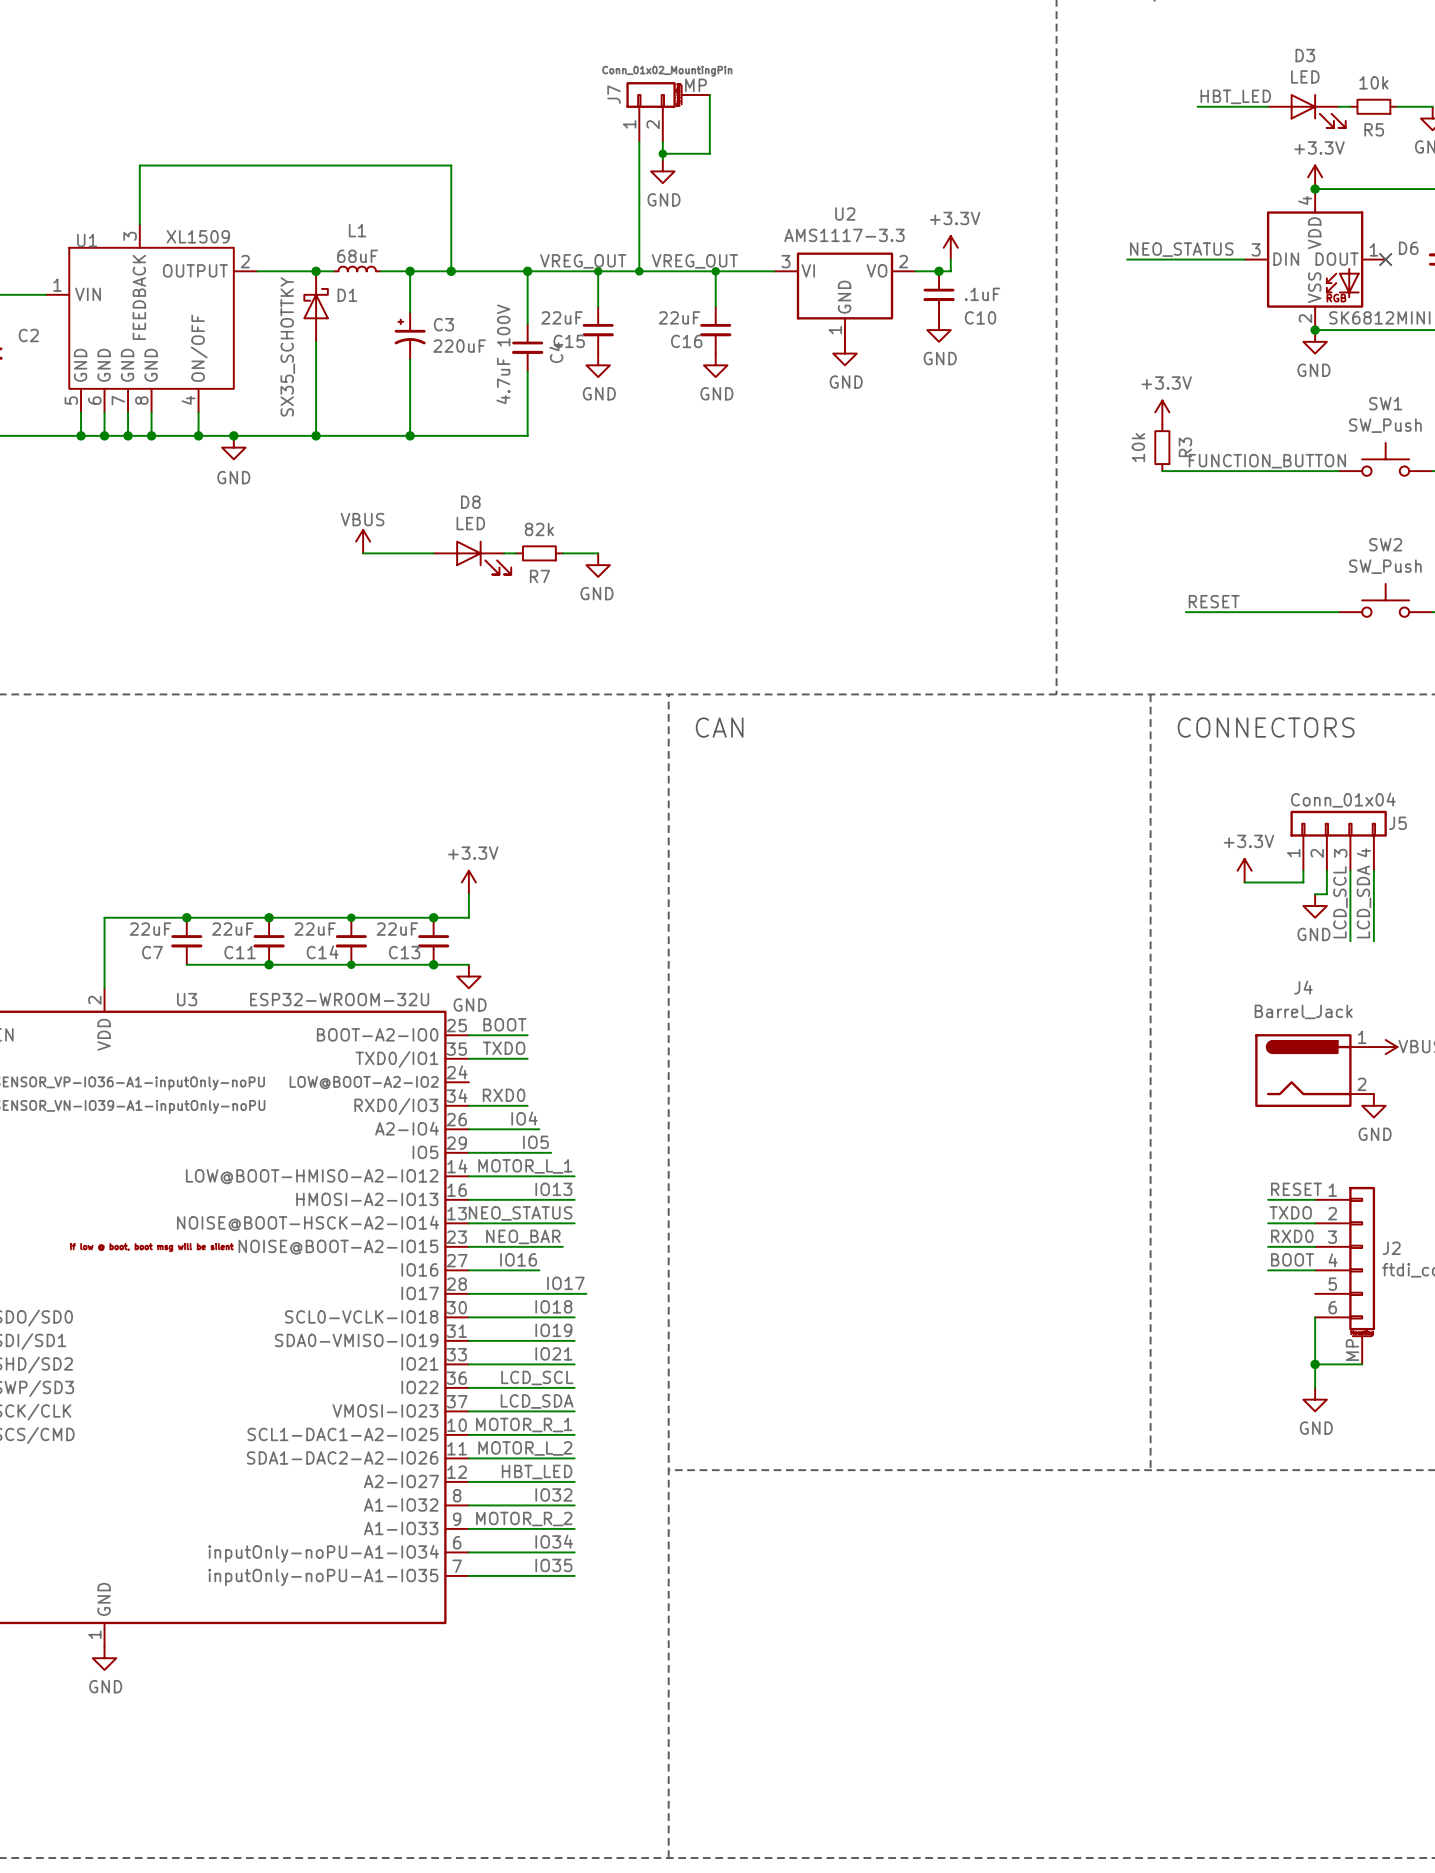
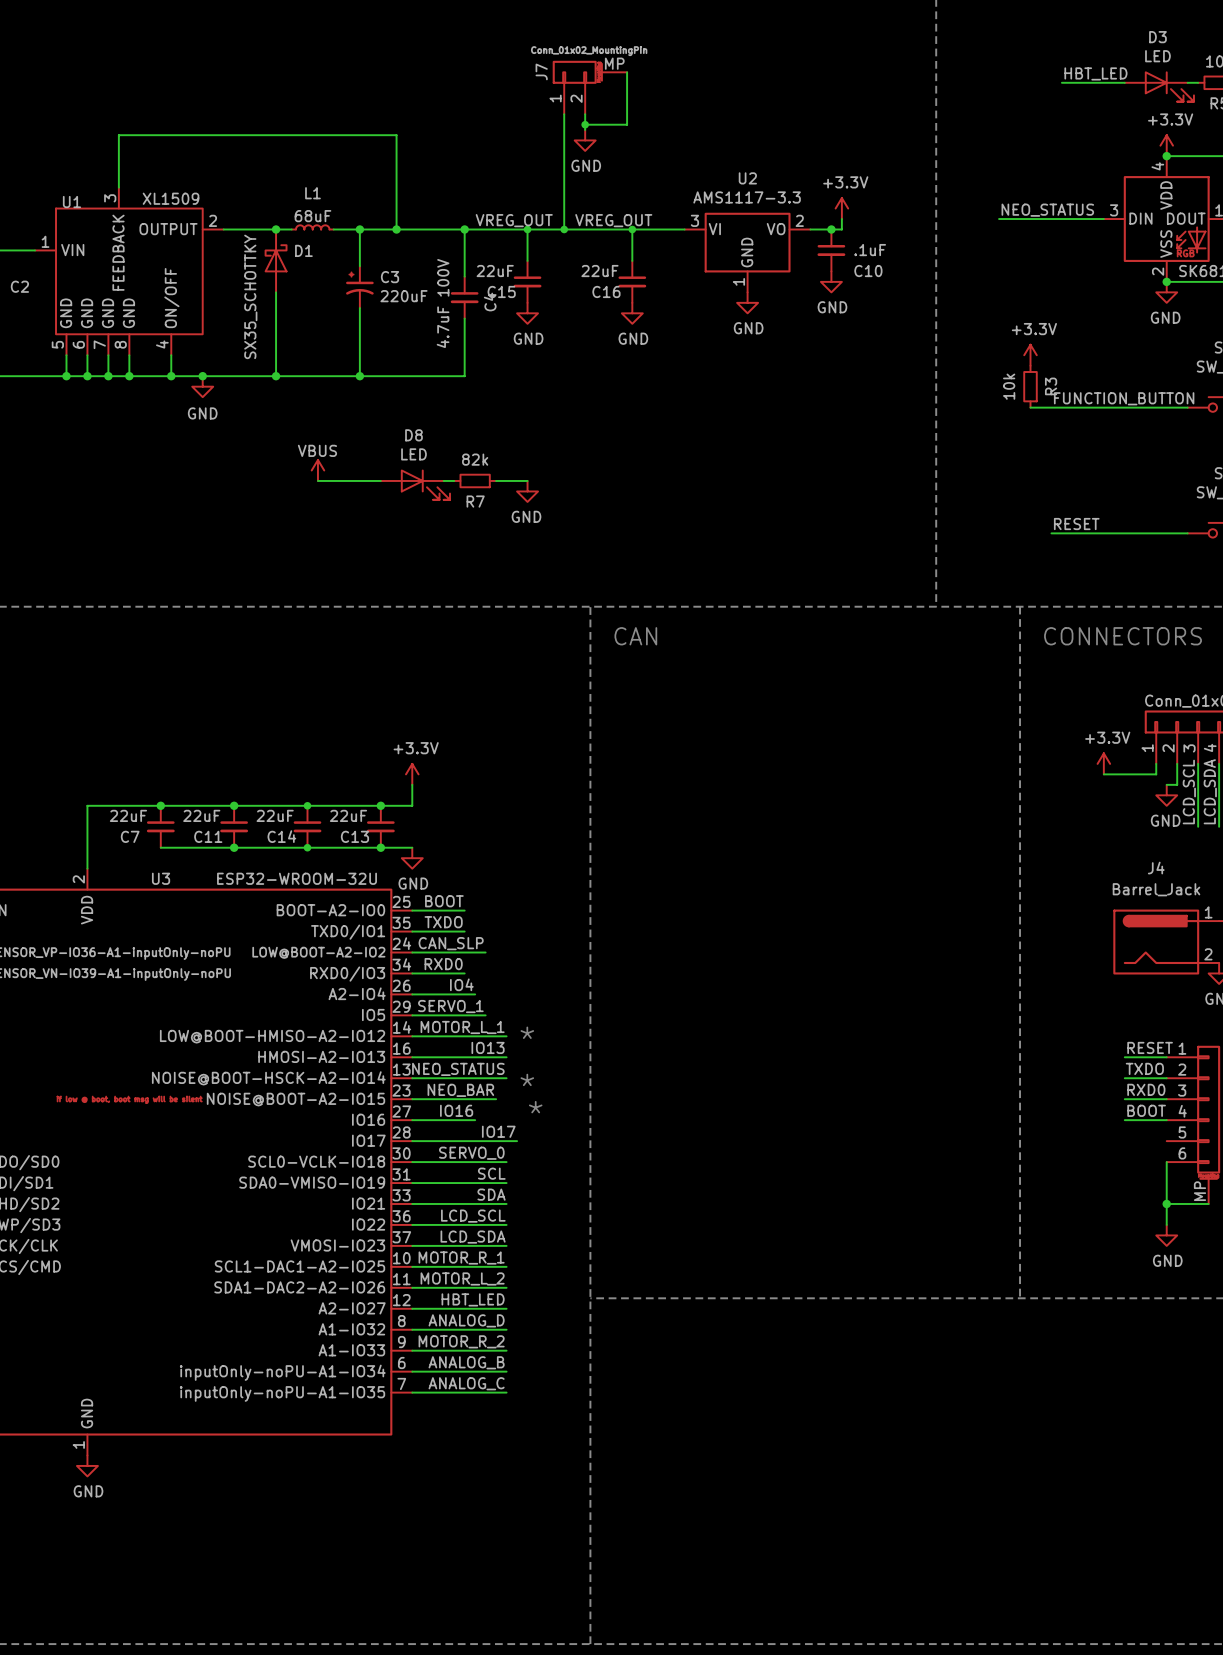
label: none -> CAN_SLP (451, 943)
wire: none -> (412, 952) (485, 952)
label: IO5 (535, 1142) -> SERVO_1 (450, 1006)
text: none -> * (527, 1032)
text: none -> * (527, 1079)
text: none -> * (535, 1107)
label: IO18 (553, 1306) -> SERVO_0 (471, 1153)
label: IO19 (553, 1330) -> SCL (491, 1173)
label: IO21 (553, 1353) -> SDA (491, 1194)
label: IO32 (553, 1494) -> ANALOG_D (466, 1320)
label: IO34 (554, 1541) -> ANALOG_B (466, 1362)
label: IO35 (553, 1565) -> ANALOG_C (466, 1383)

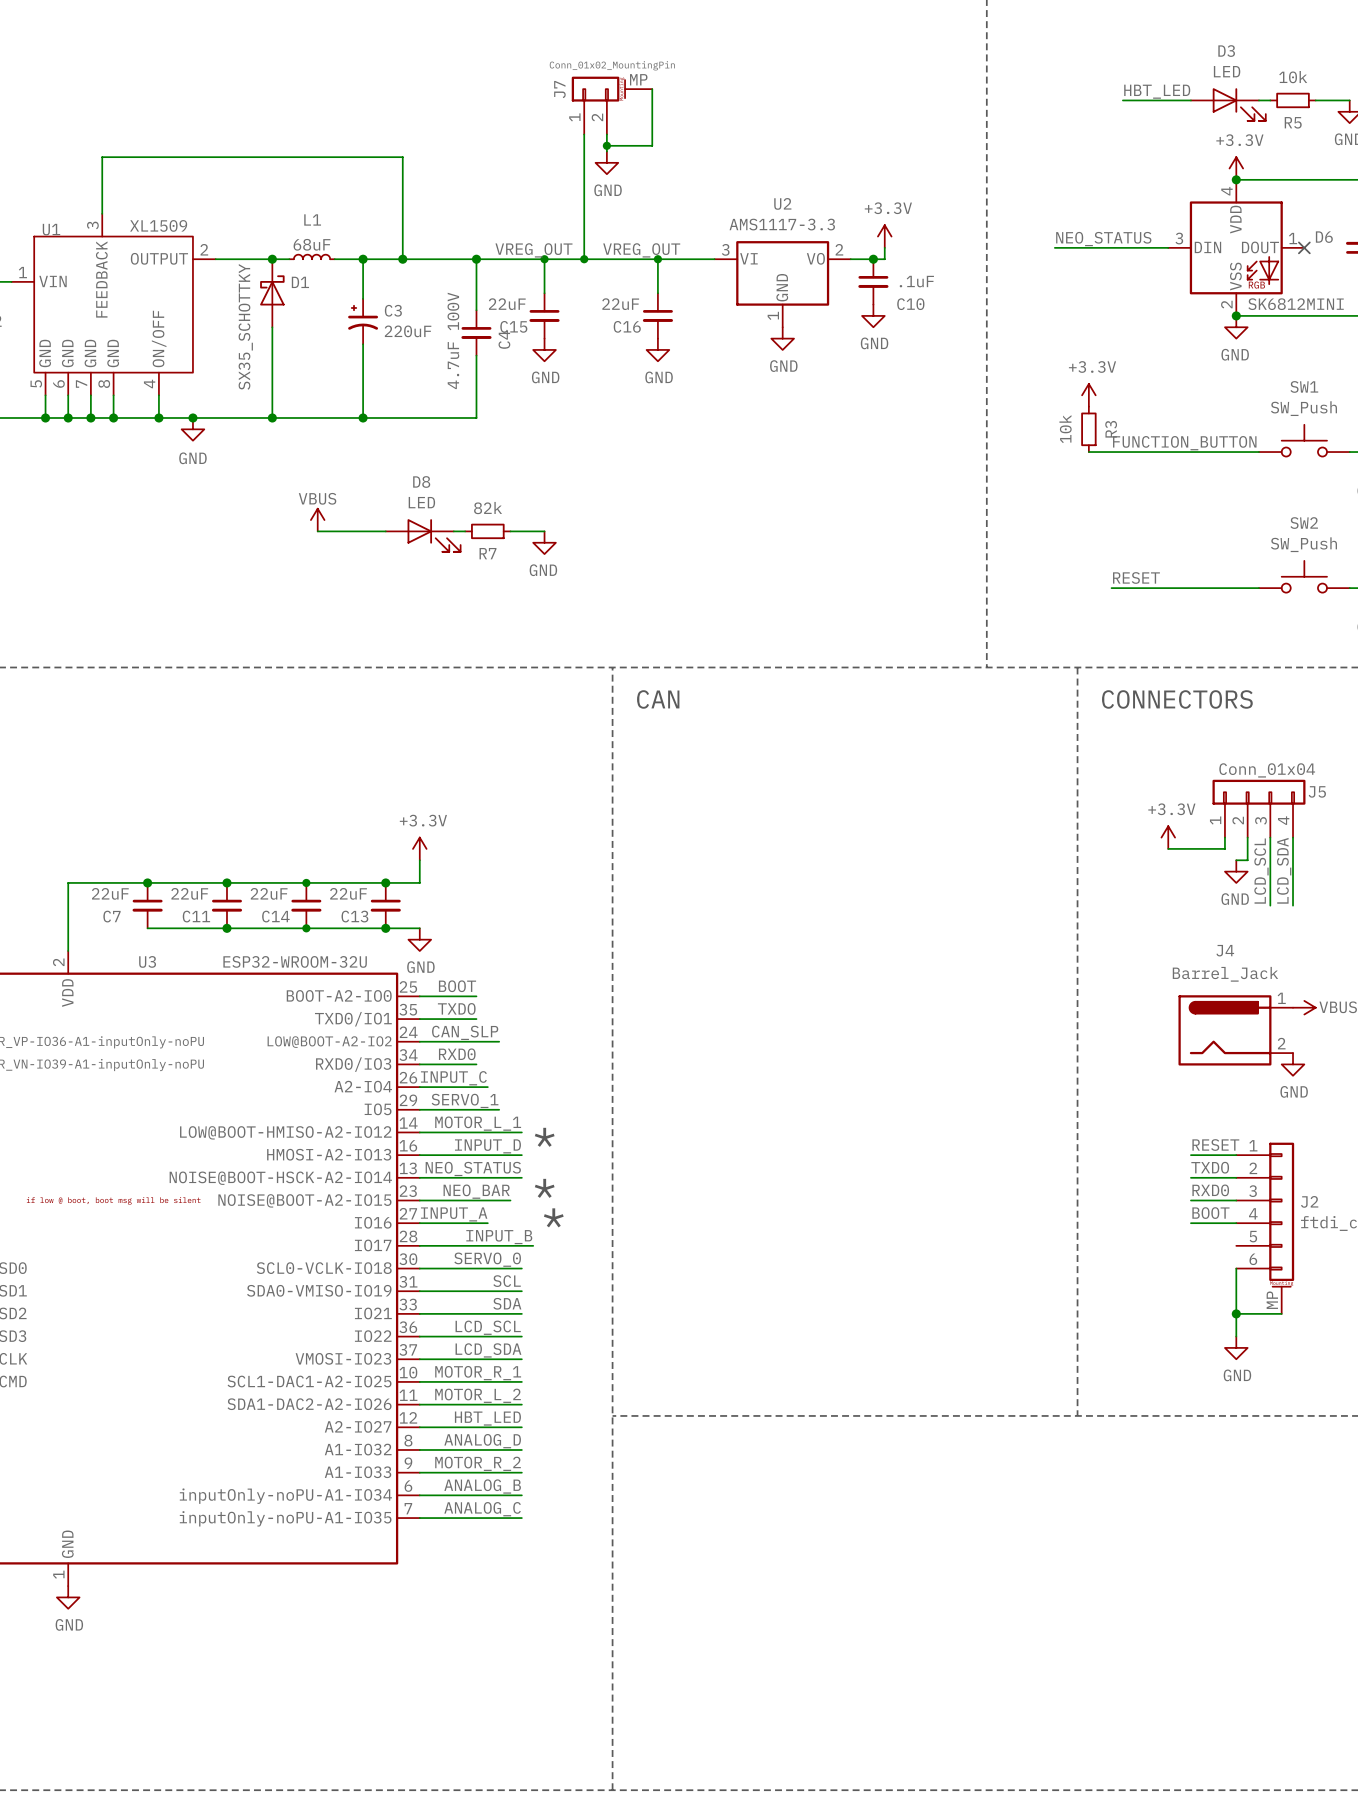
label: IO4 (461, 984) -> INPUT_C (453, 1078)
label: IO13 (488, 1047) -> INPUT_D (487, 1146)
label: IO16 (456, 1110) -> INPUT_A (454, 1214)
label: IO17 (498, 1131) -> INPUT_B (499, 1237)

